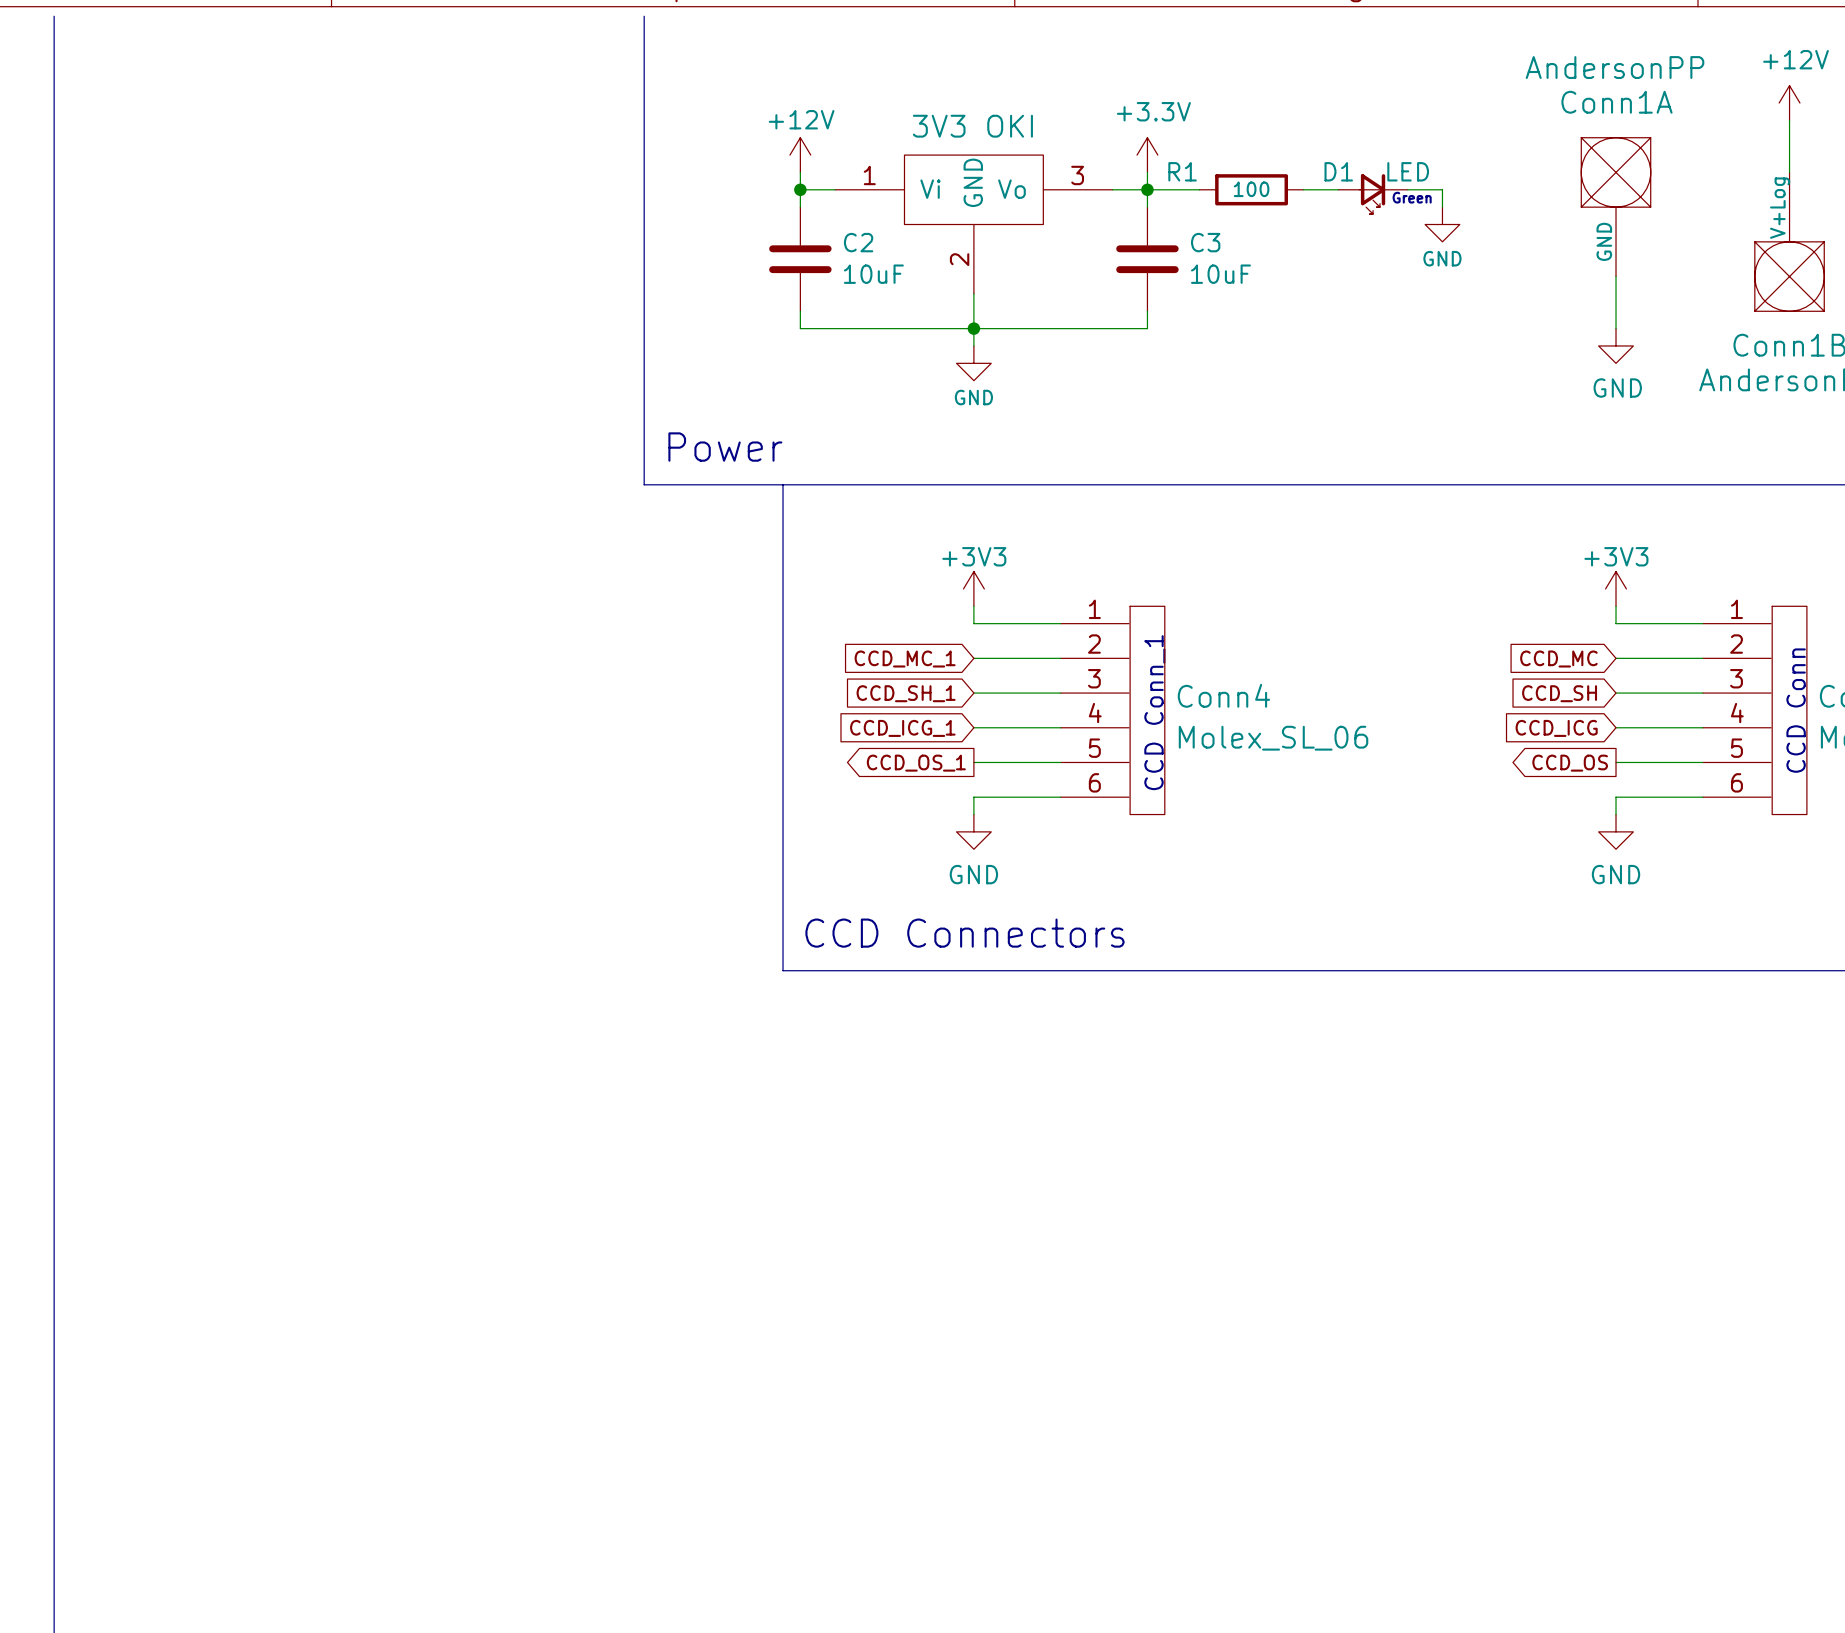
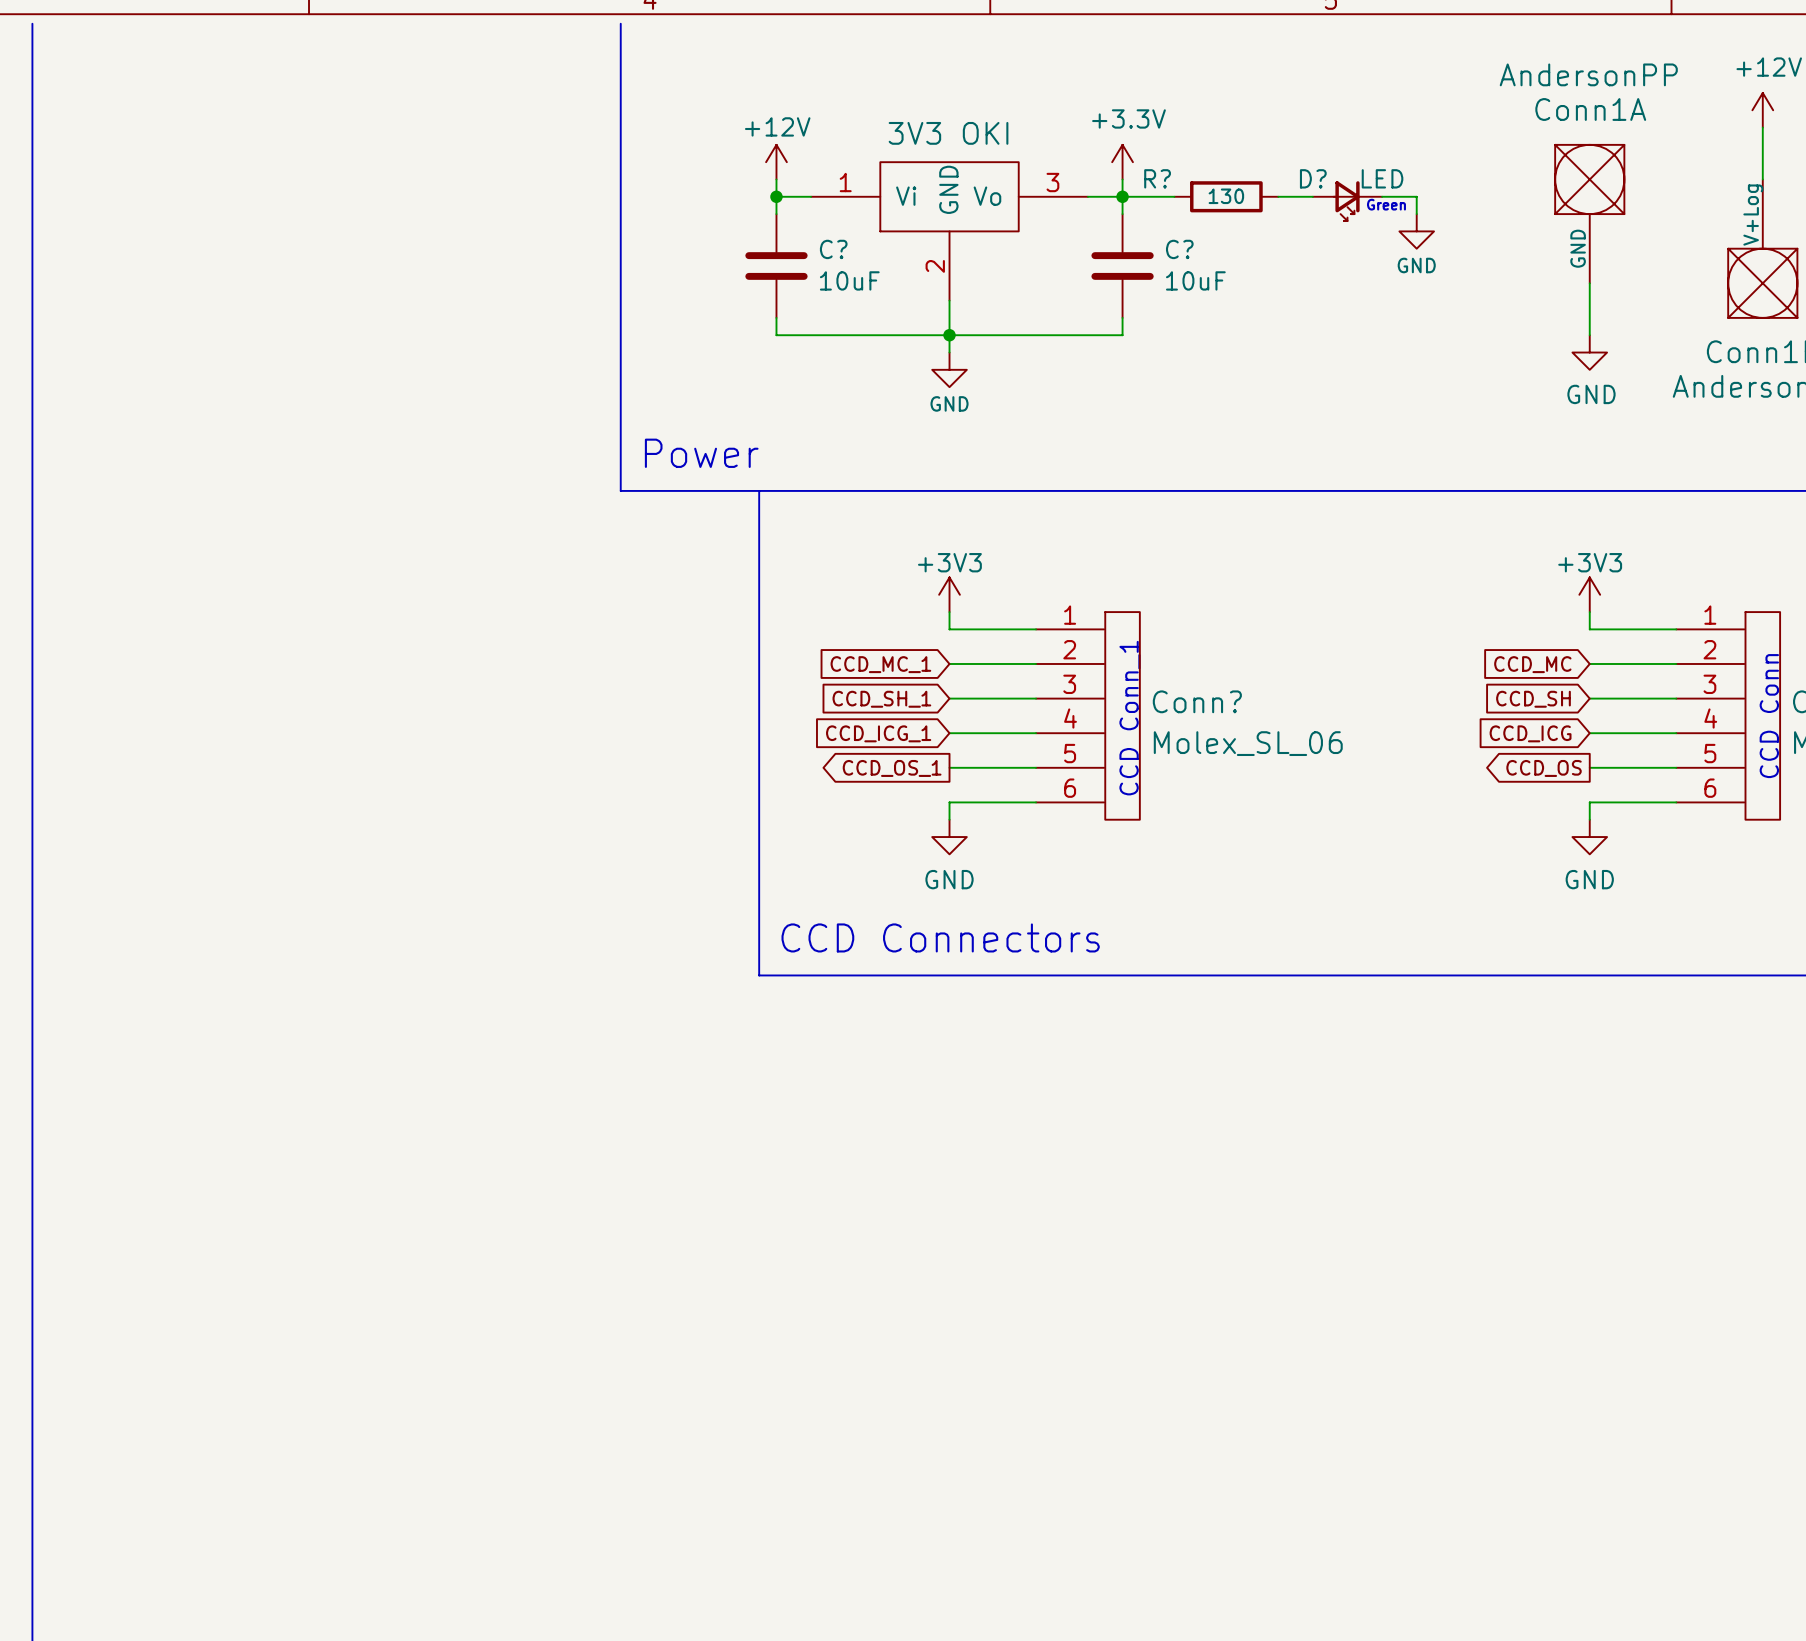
R1 name: R1 (1182, 171) -> R? (1157, 178)
D1 name: D1 (1338, 171) -> D? (1313, 178)
R1 value: 100 (1251, 189) -> 130 (1226, 196)
C2 name: C2 (858, 242) -> C? (833, 249)
C3 name: C3 (1205, 242) -> C? (1179, 249)
Conn4 name: Conn4 (1223, 695) -> Conn? (1197, 701)

